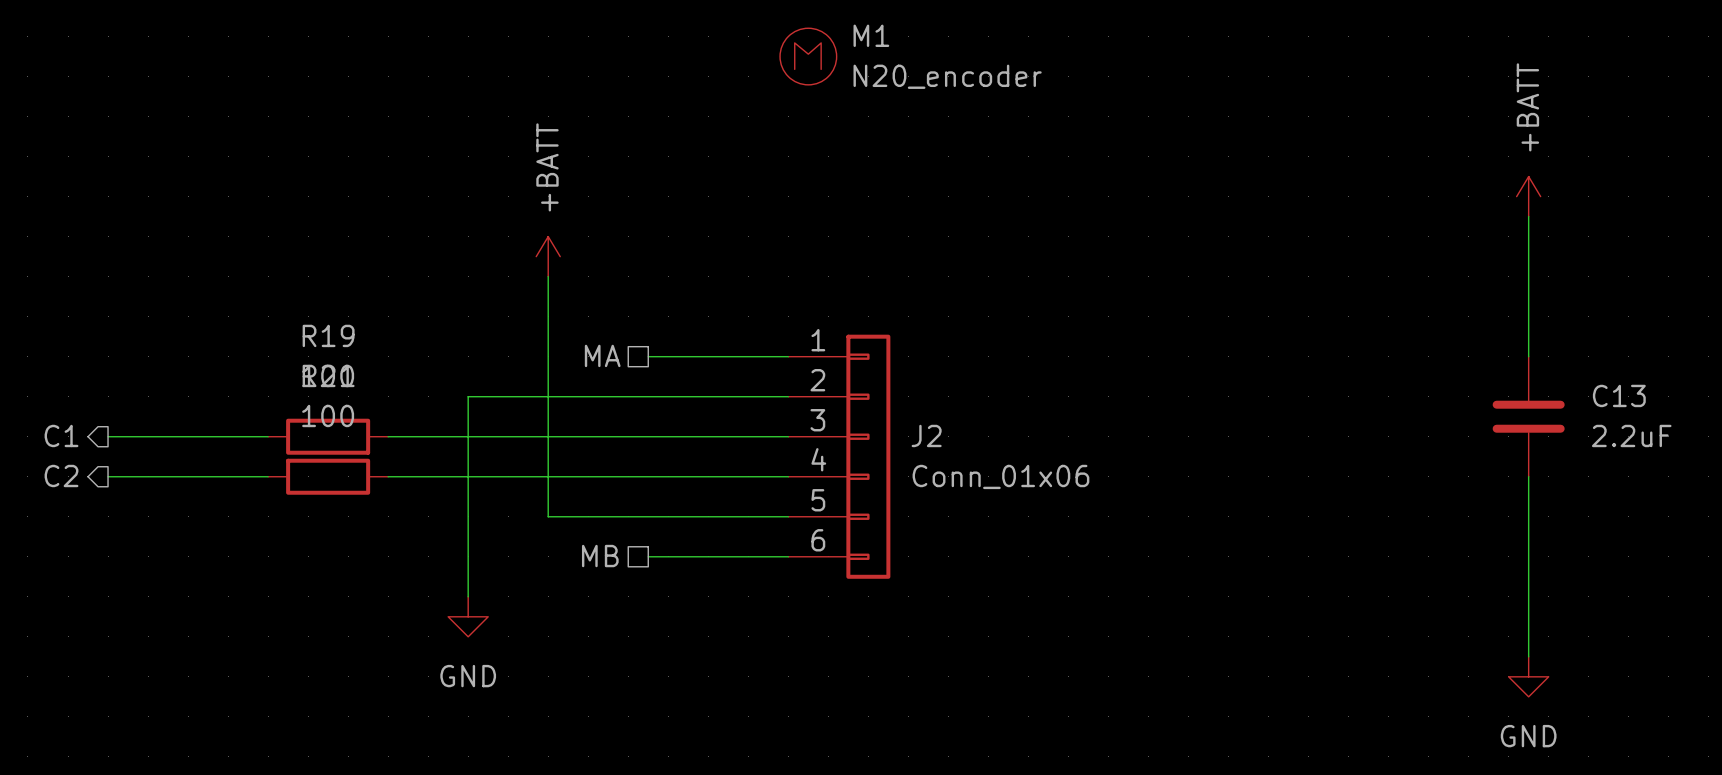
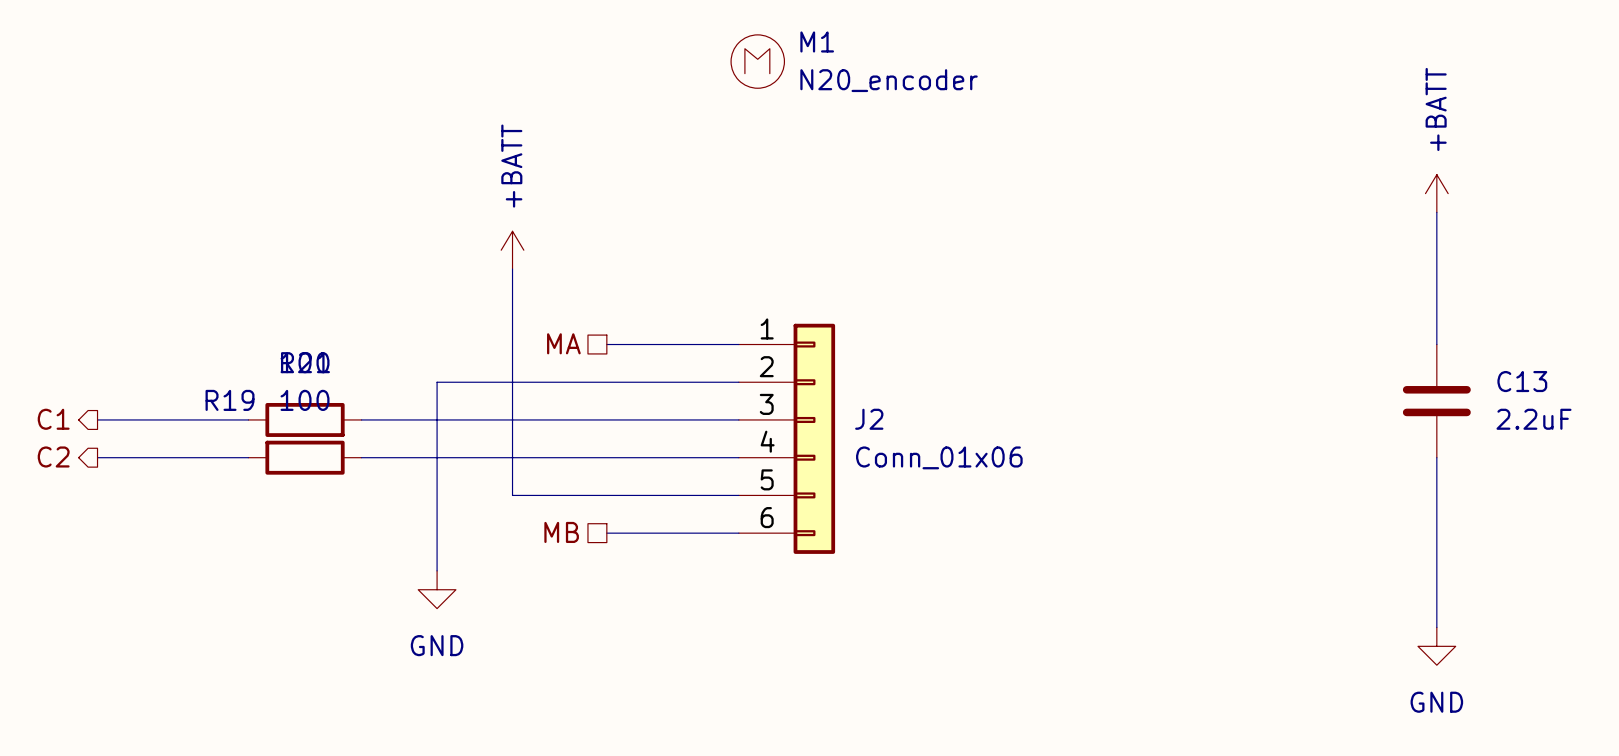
R19 name position: R19 (328, 335) -> R19 (230, 400)

